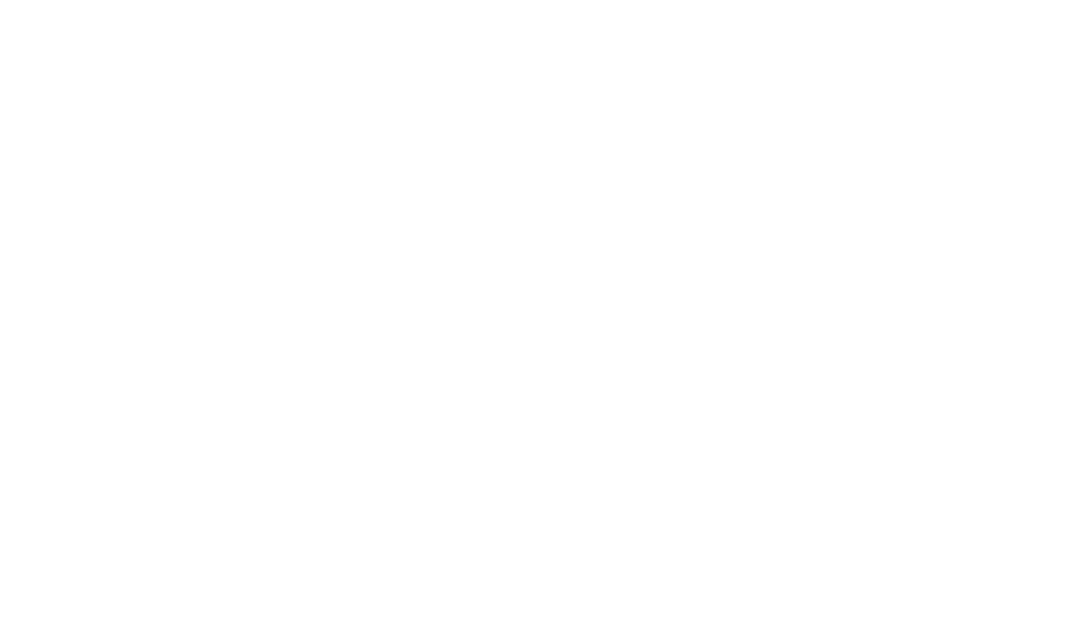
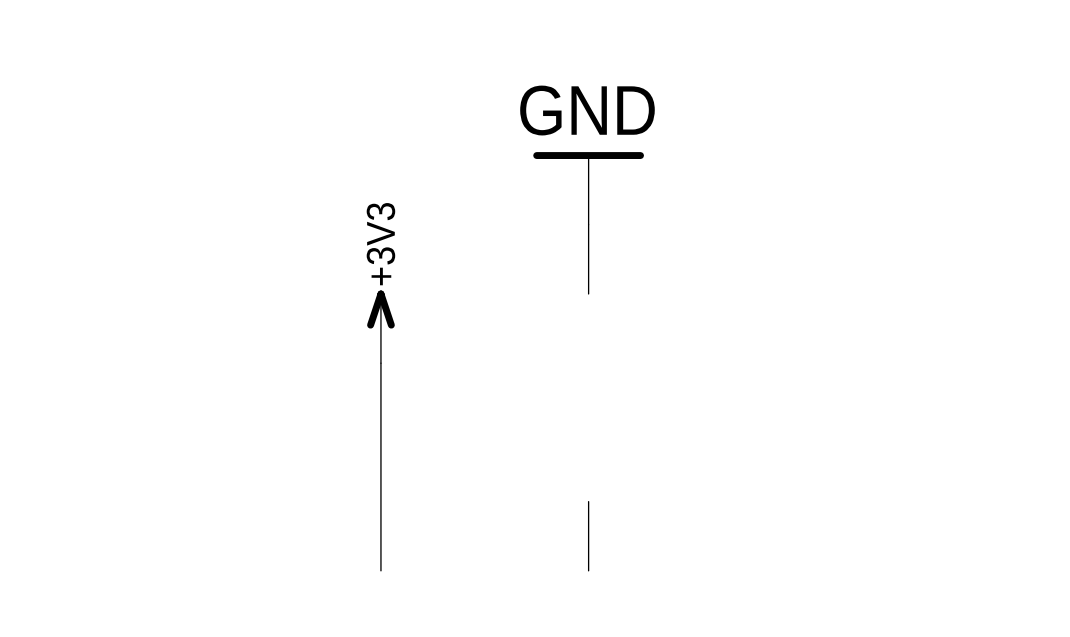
power symbol: none -> GND (588, 188)
wire: none -> (588, 224) (588, 293)
power symbol: none -> +3V3 (380, 326)
wire: none -> (380, 363) (380, 570)
wire: none -> (588, 501) (588, 570)

